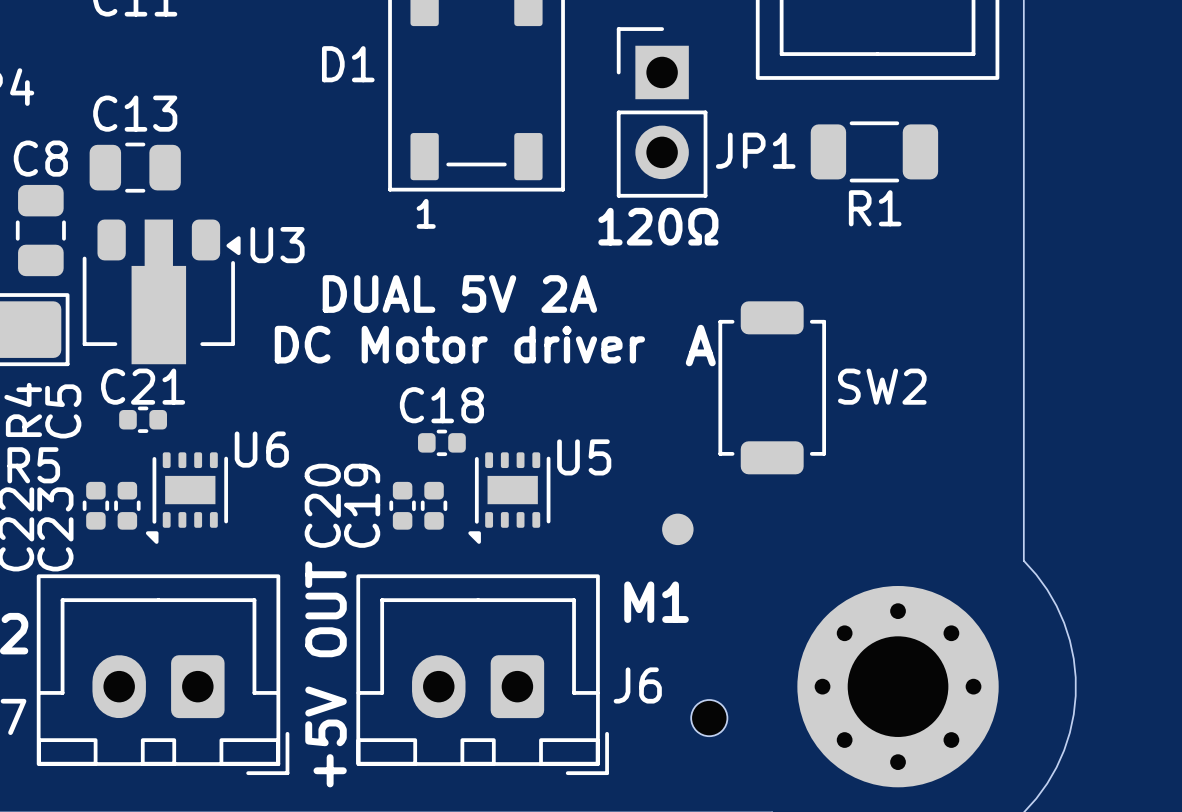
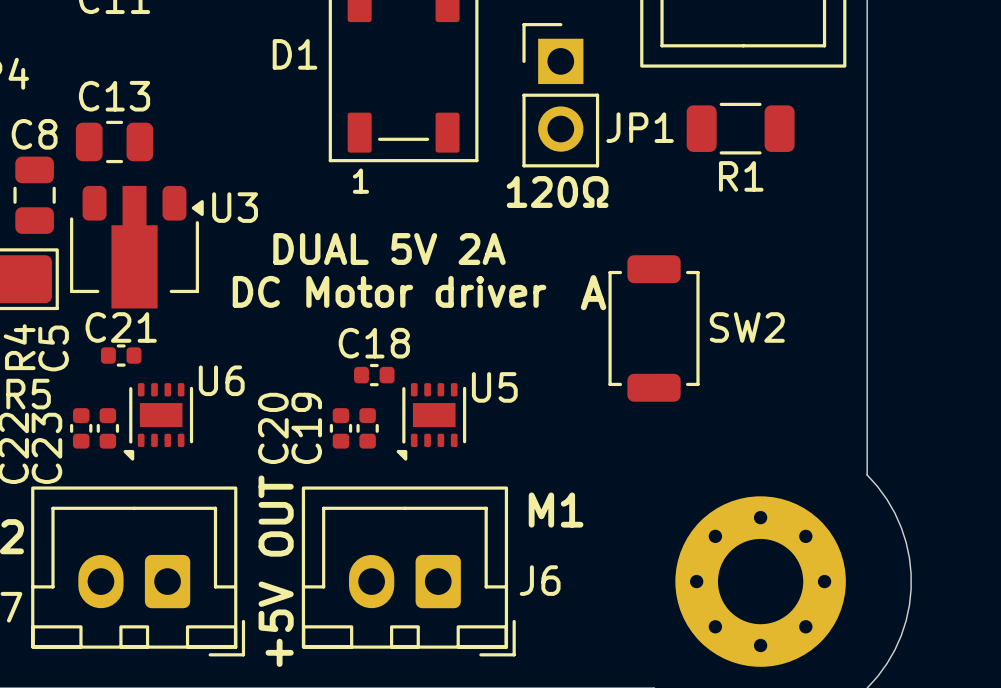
part: (677, 529) -> none
part: (709, 718) -> none

